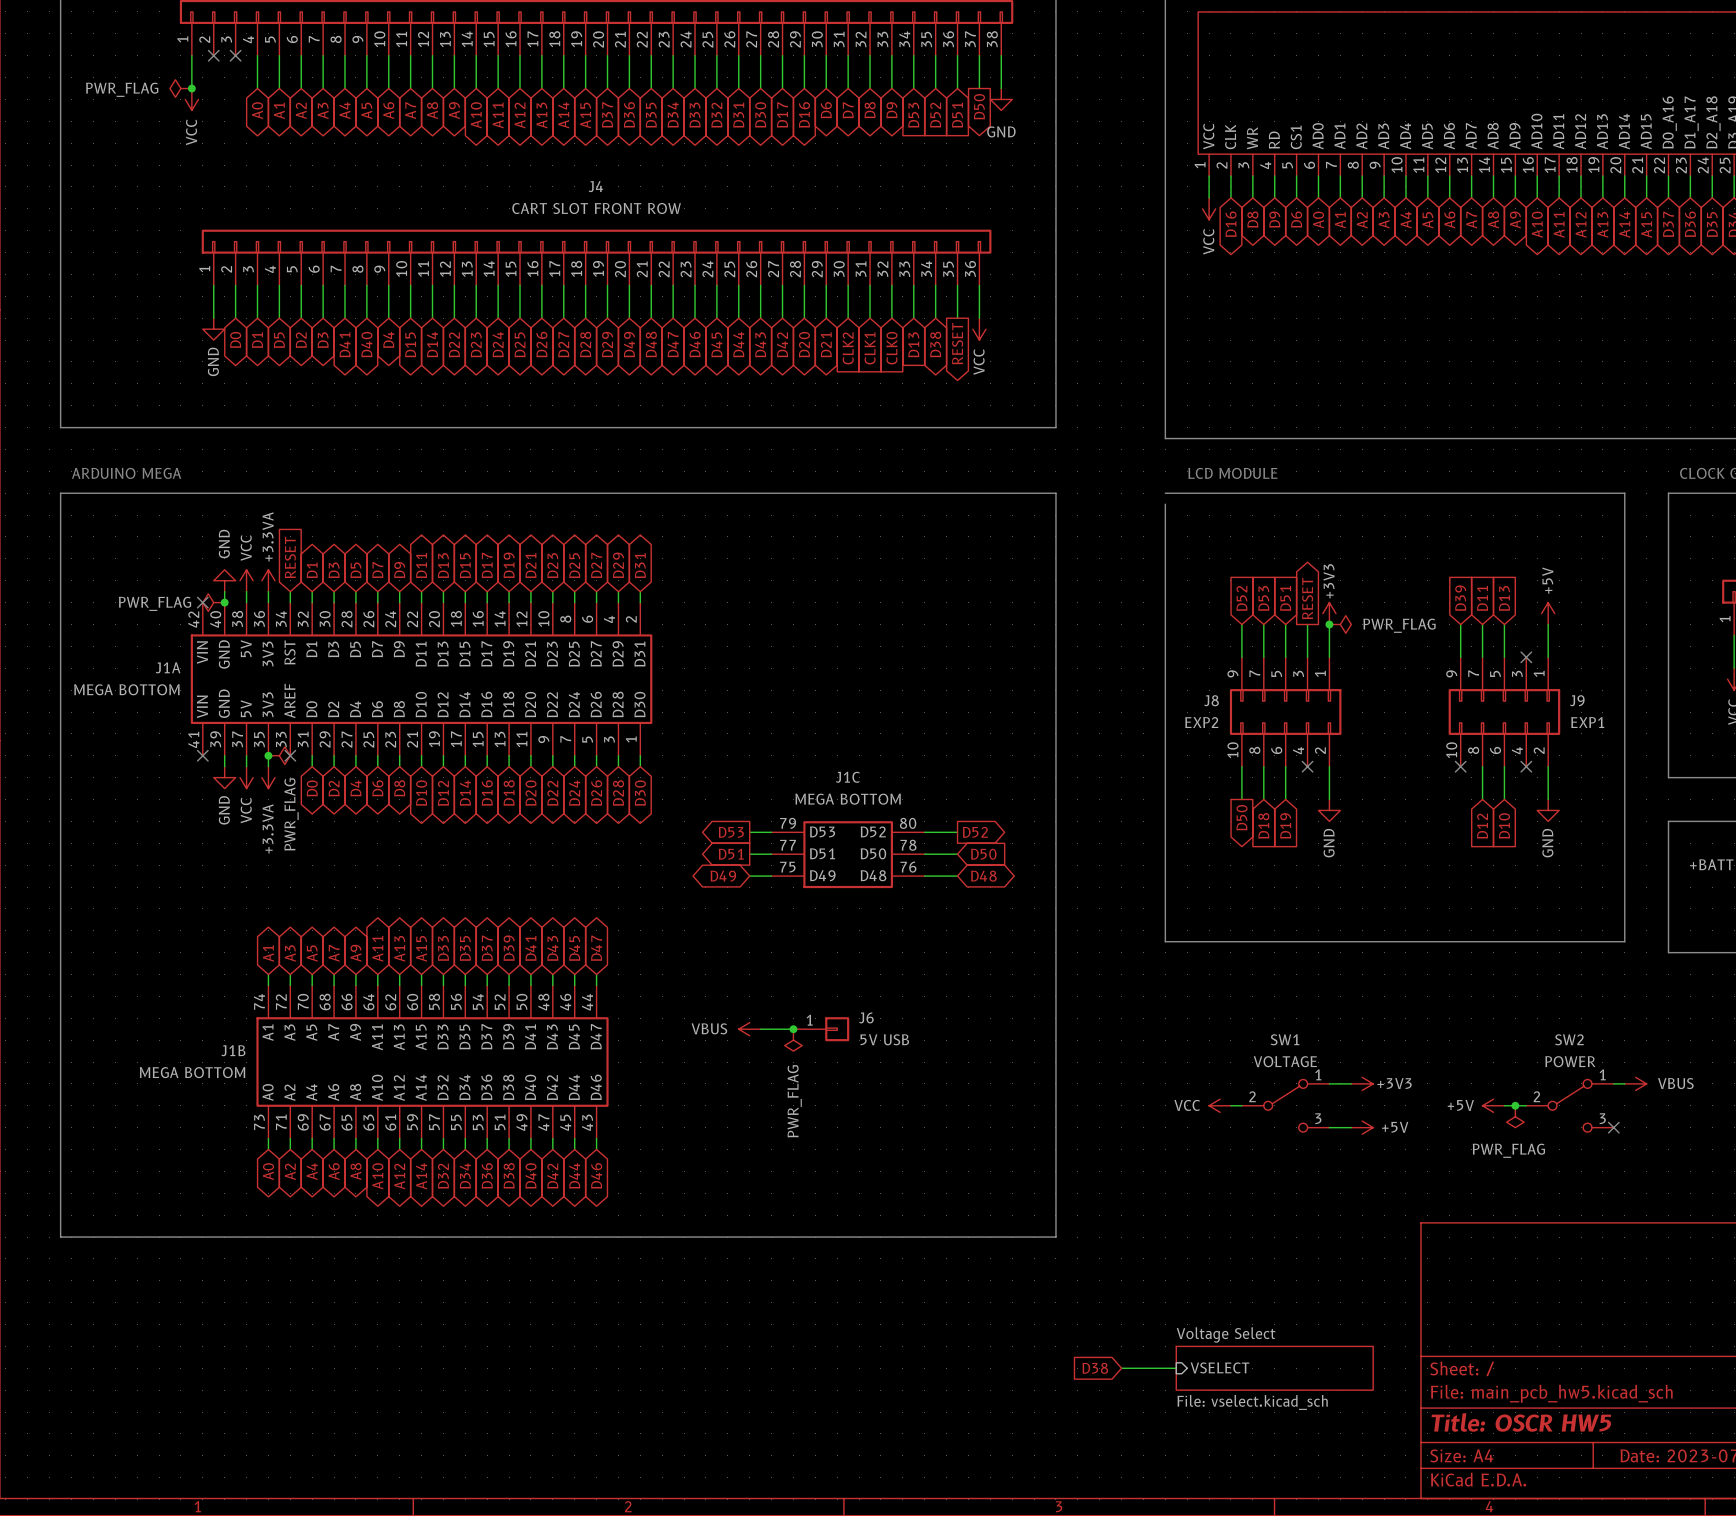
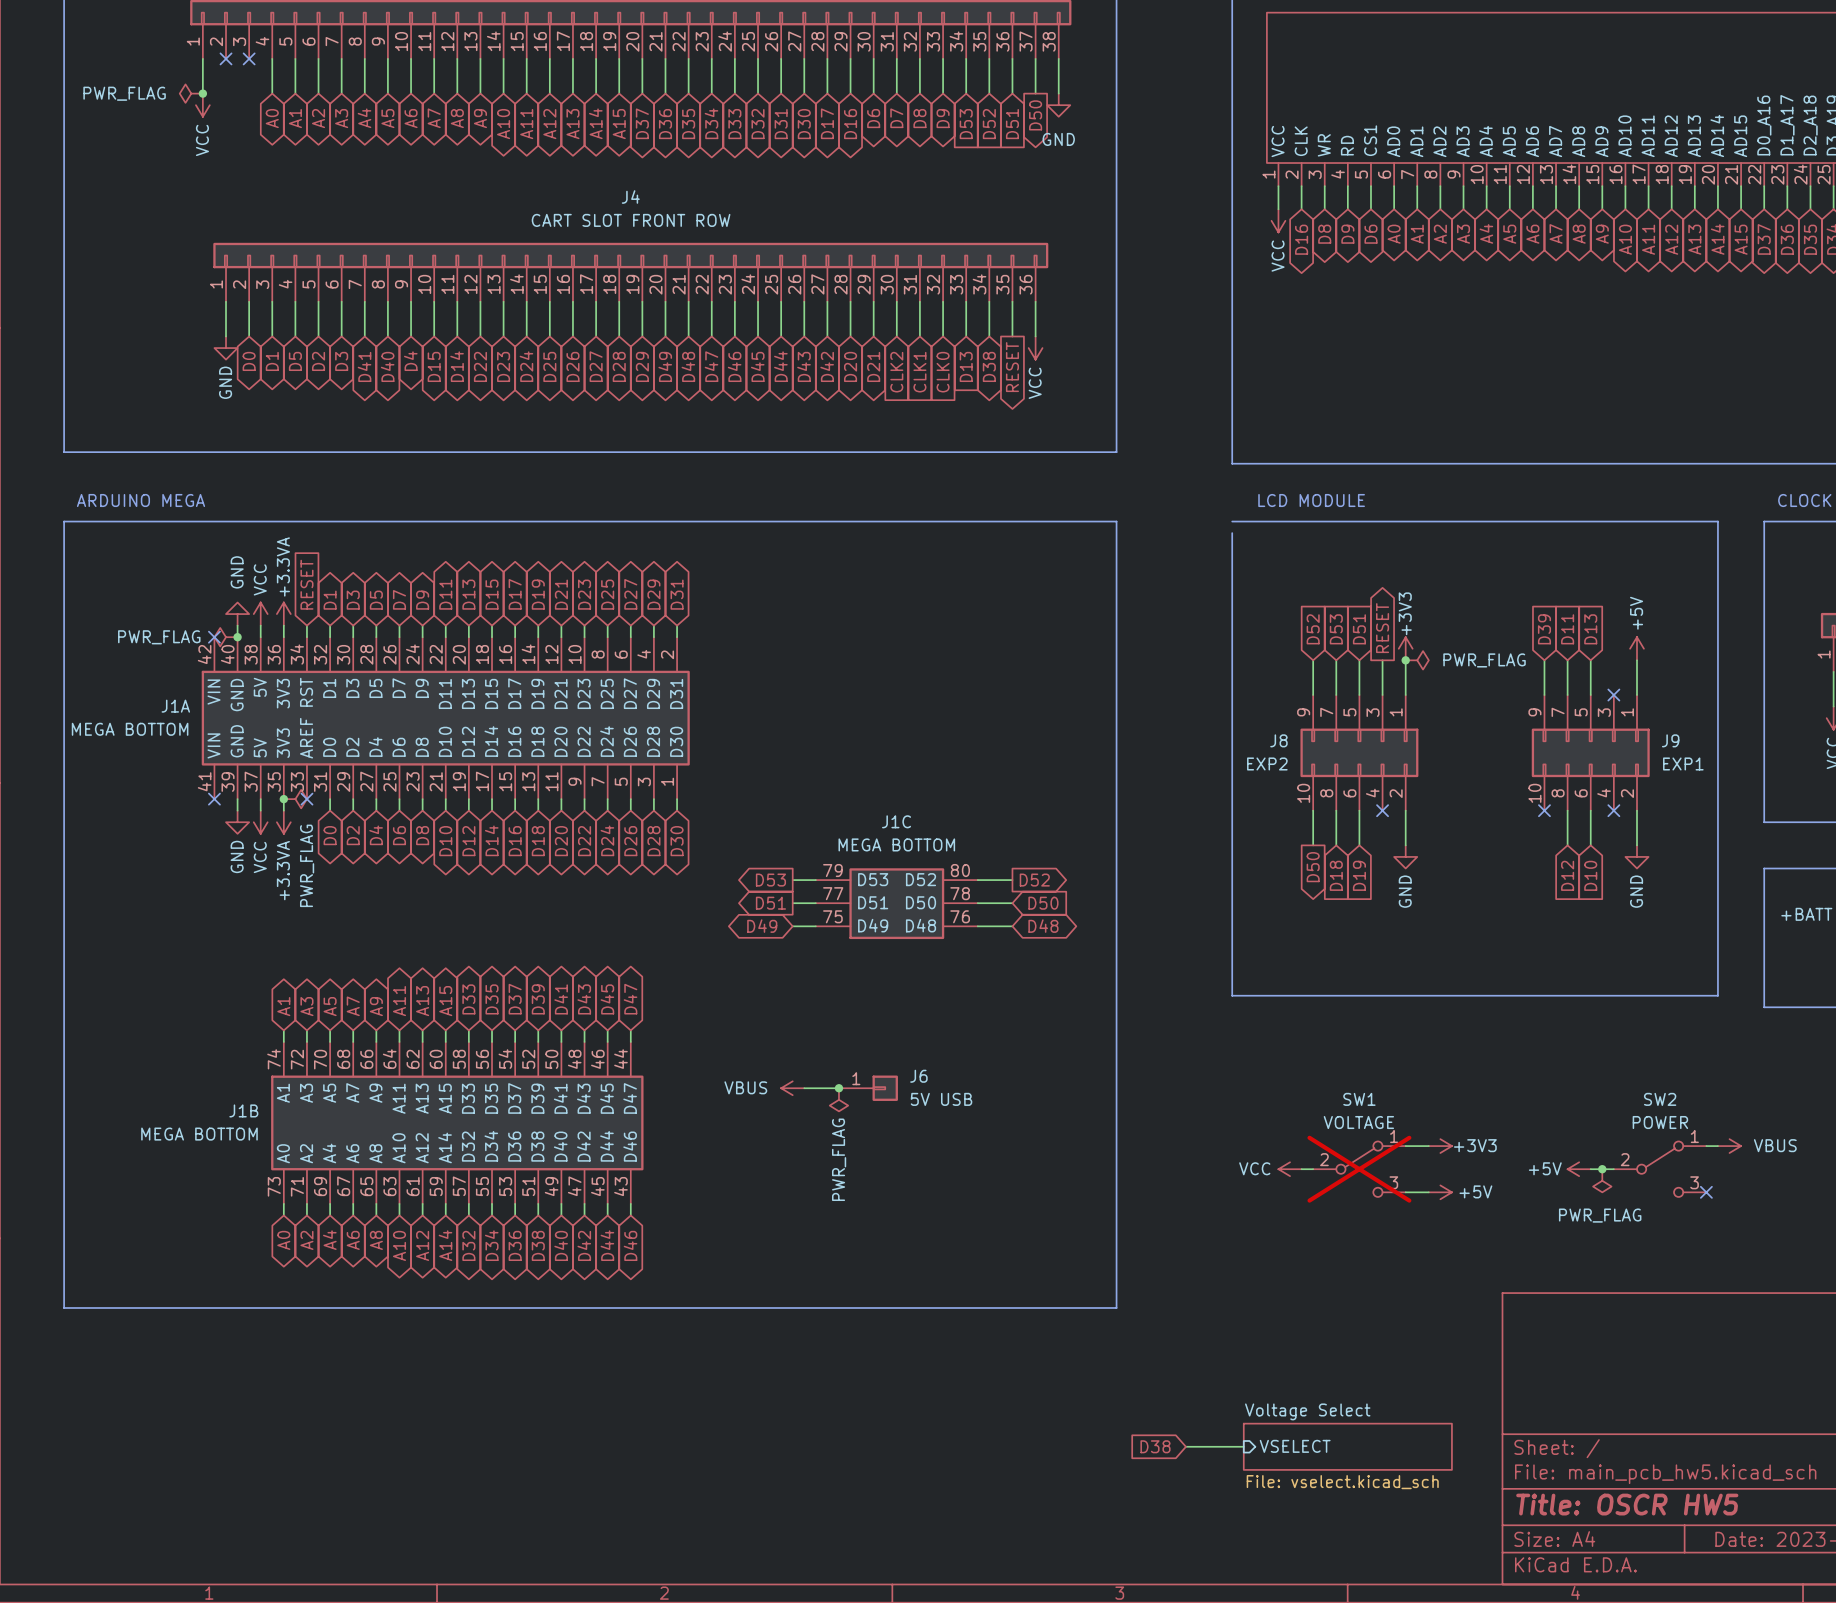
SW1 do-not-place cross: none -> (1359, 1169)

